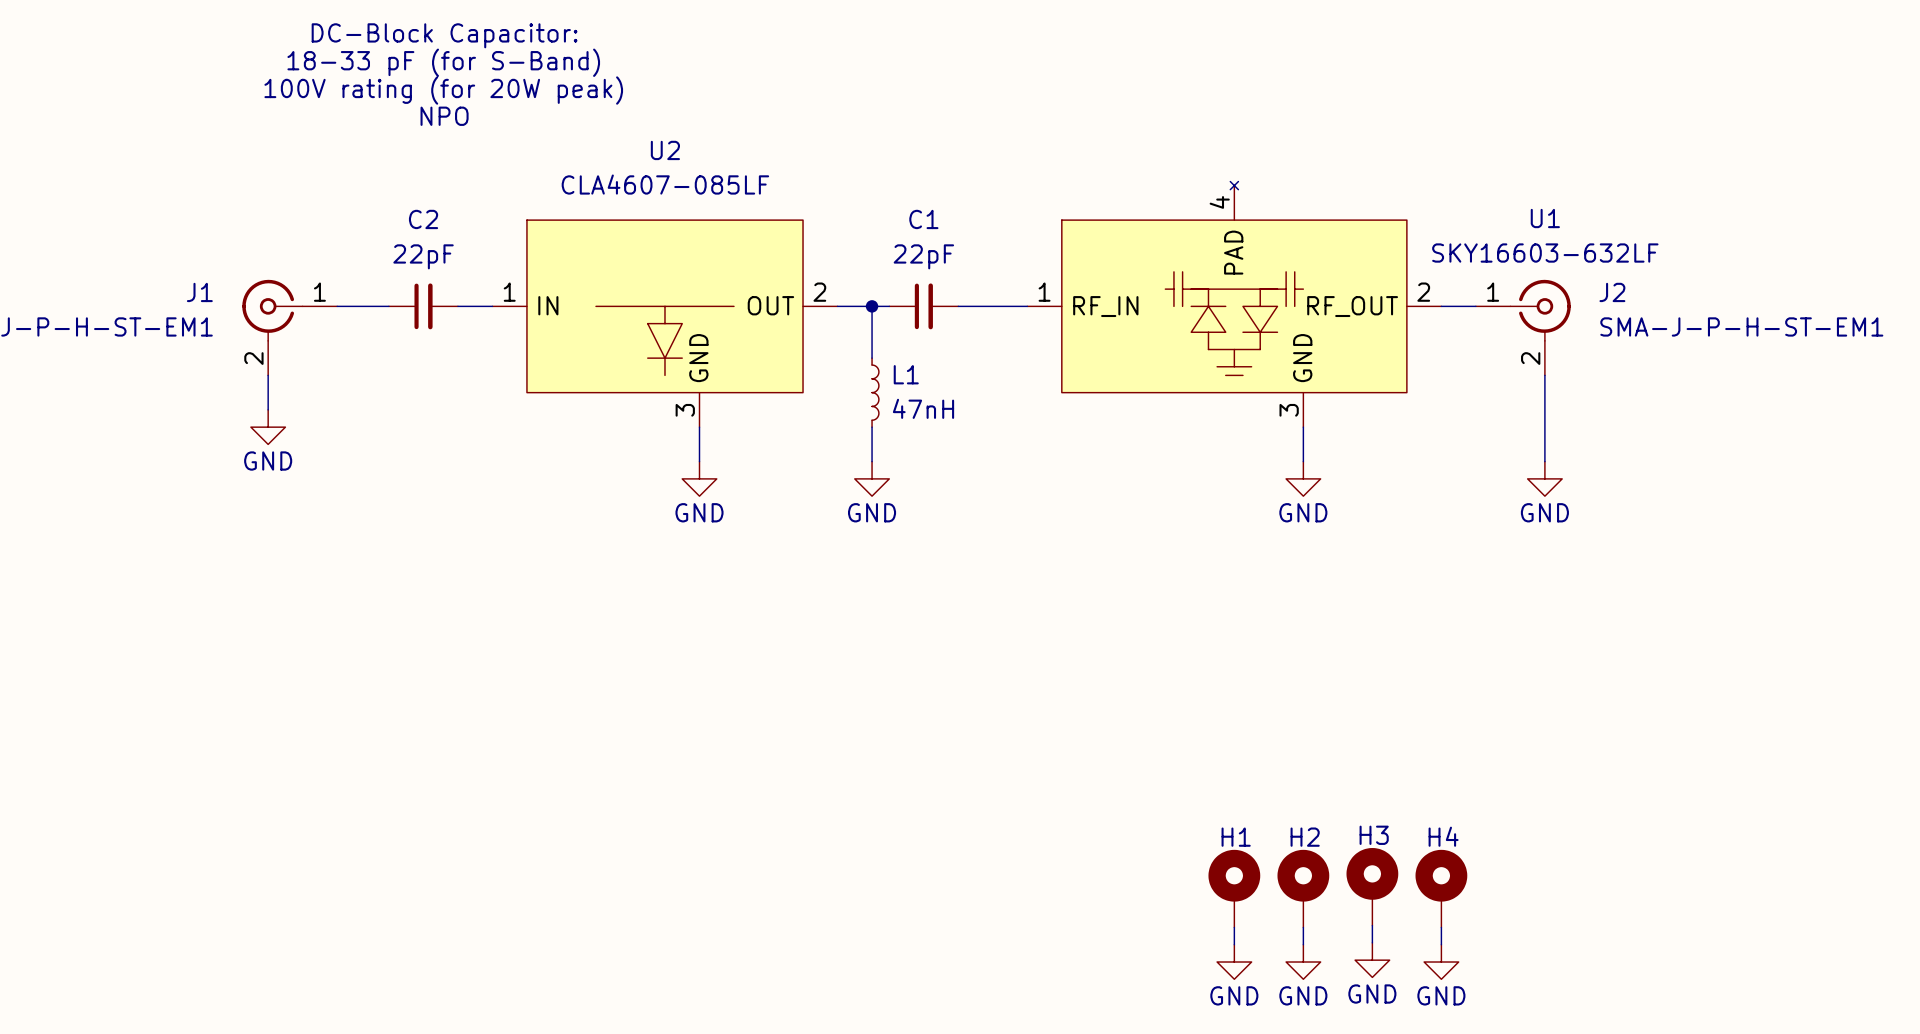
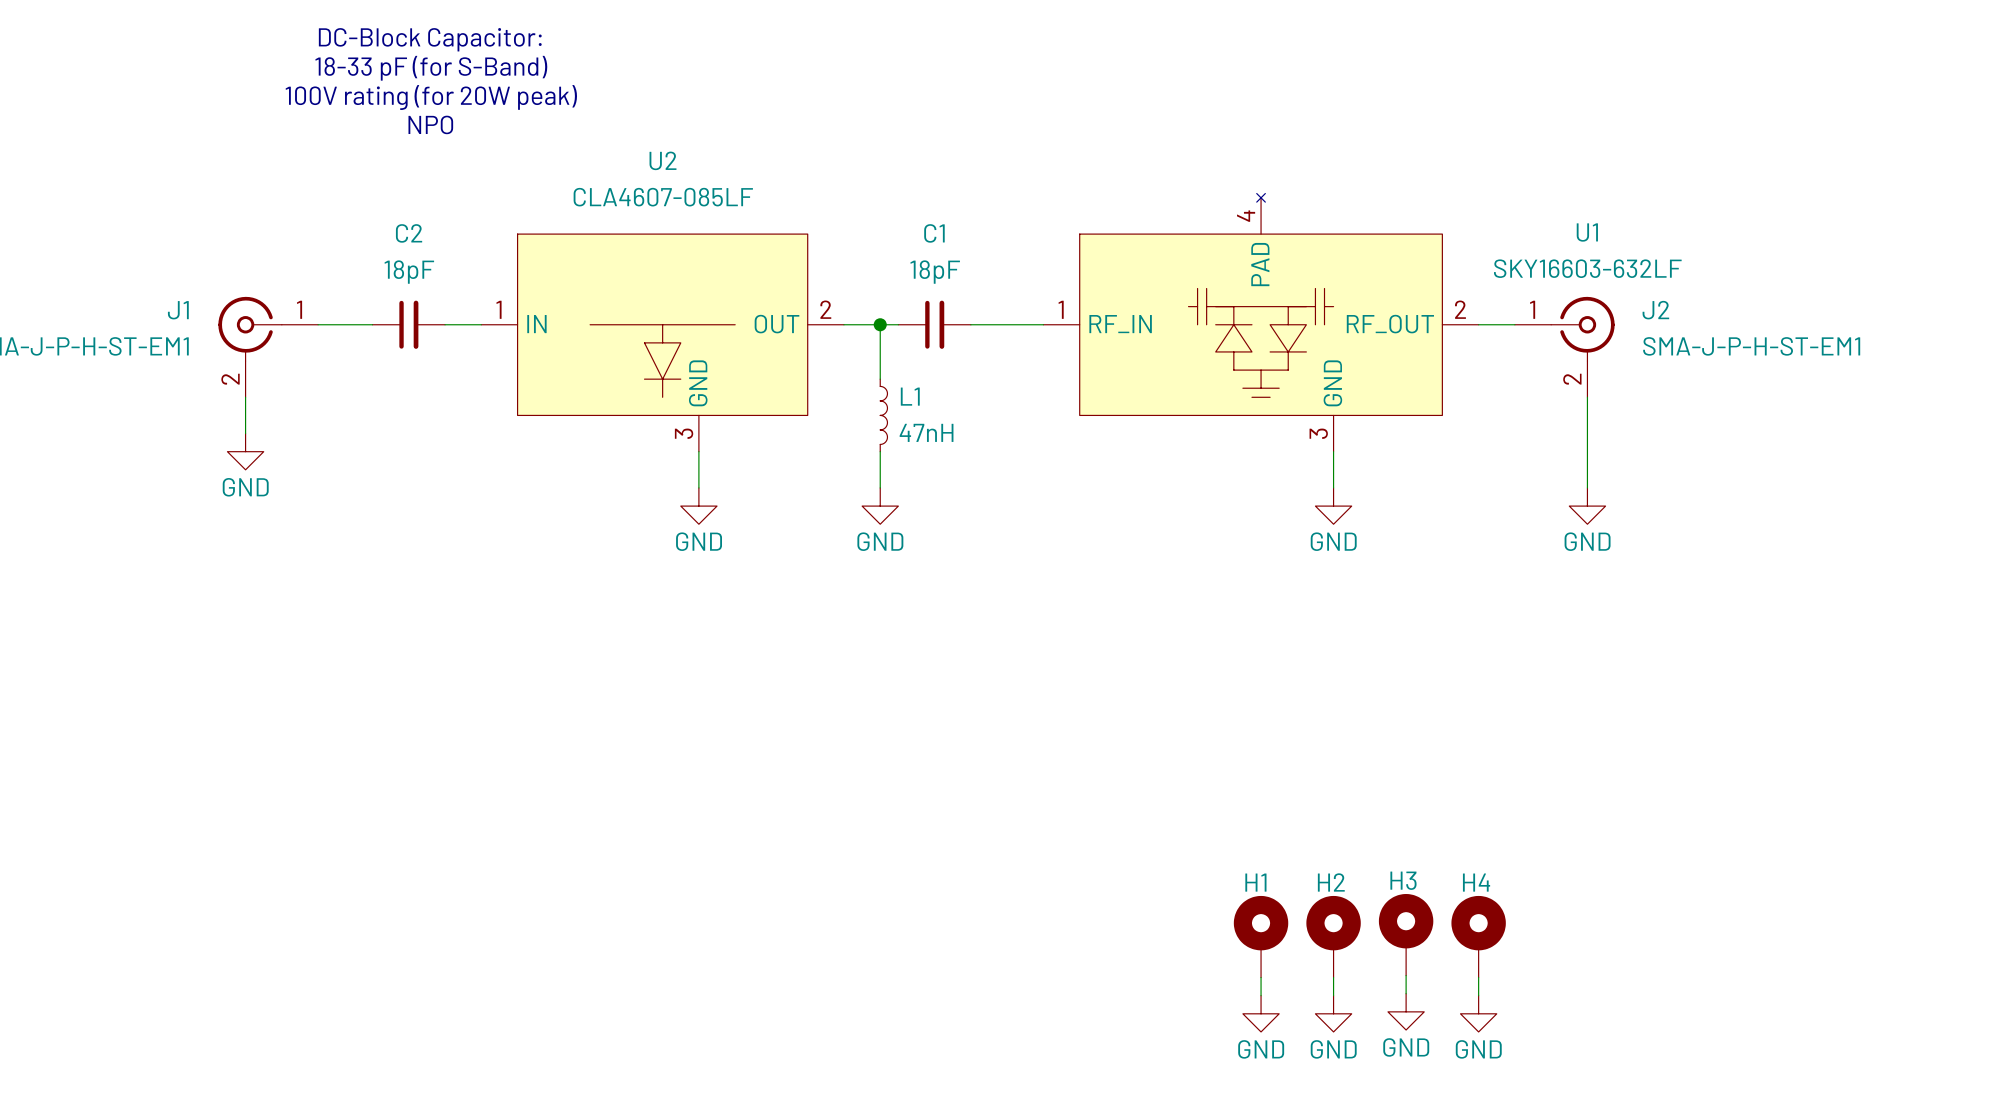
C2 value: 22pF (423, 256) -> 18pF (409, 272)
C1 value: 22pF (923, 256) -> 18pF (935, 272)

